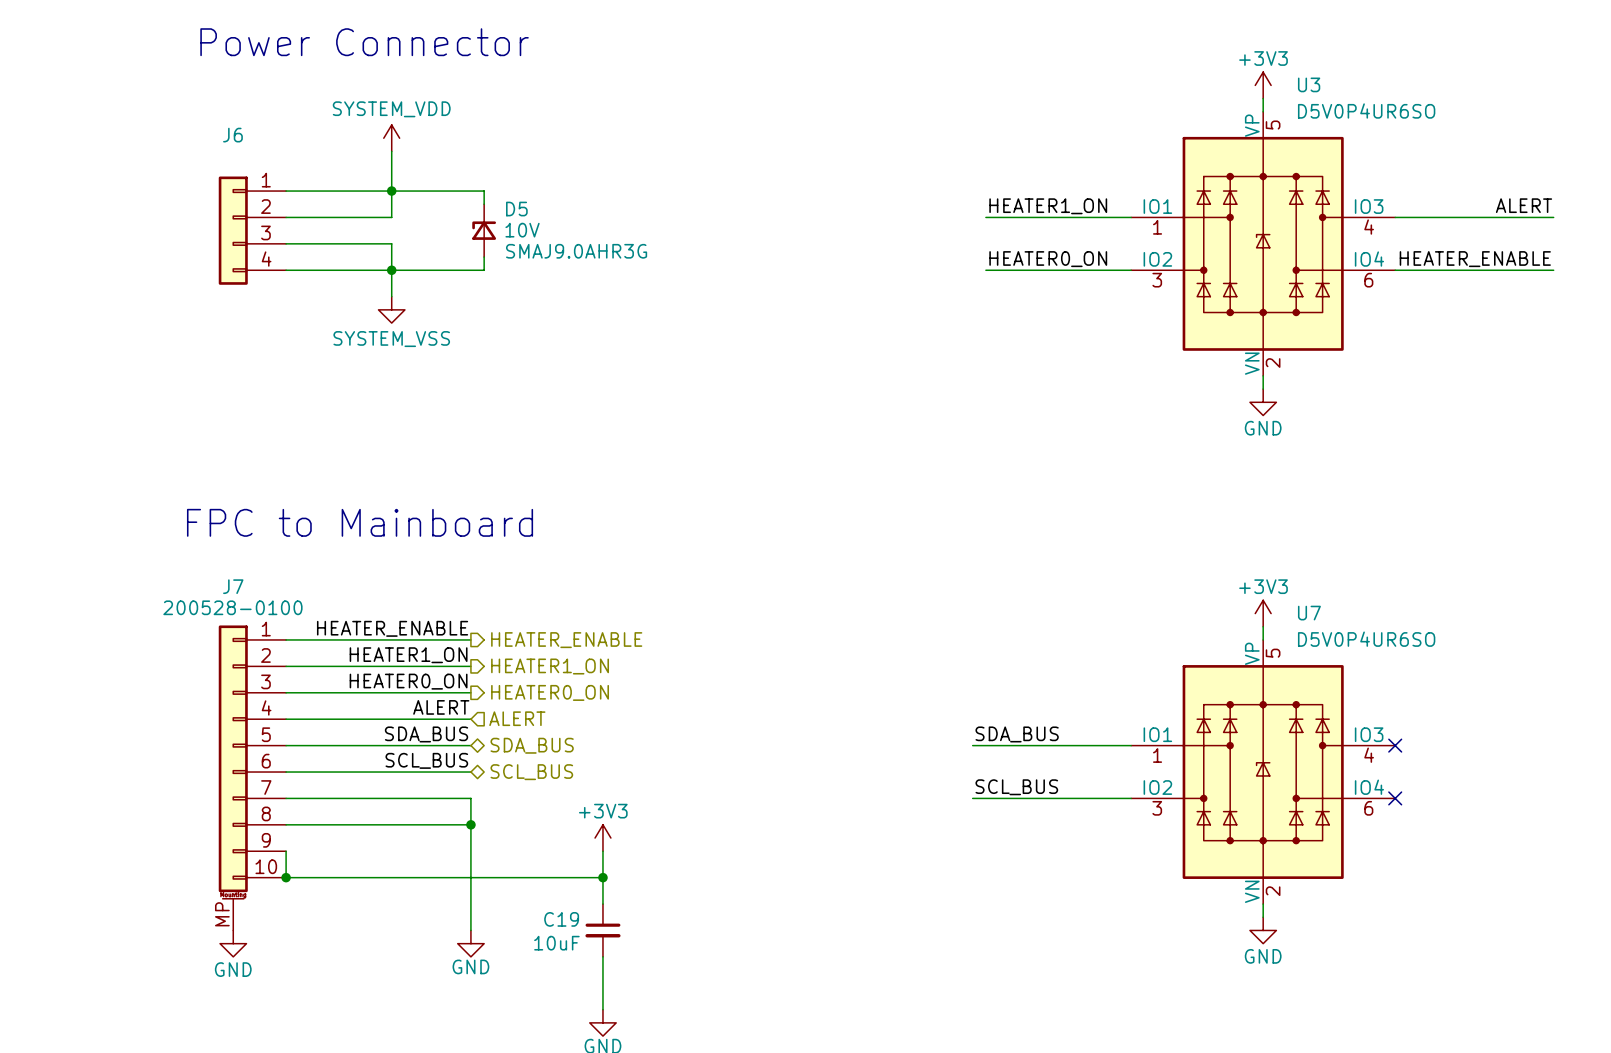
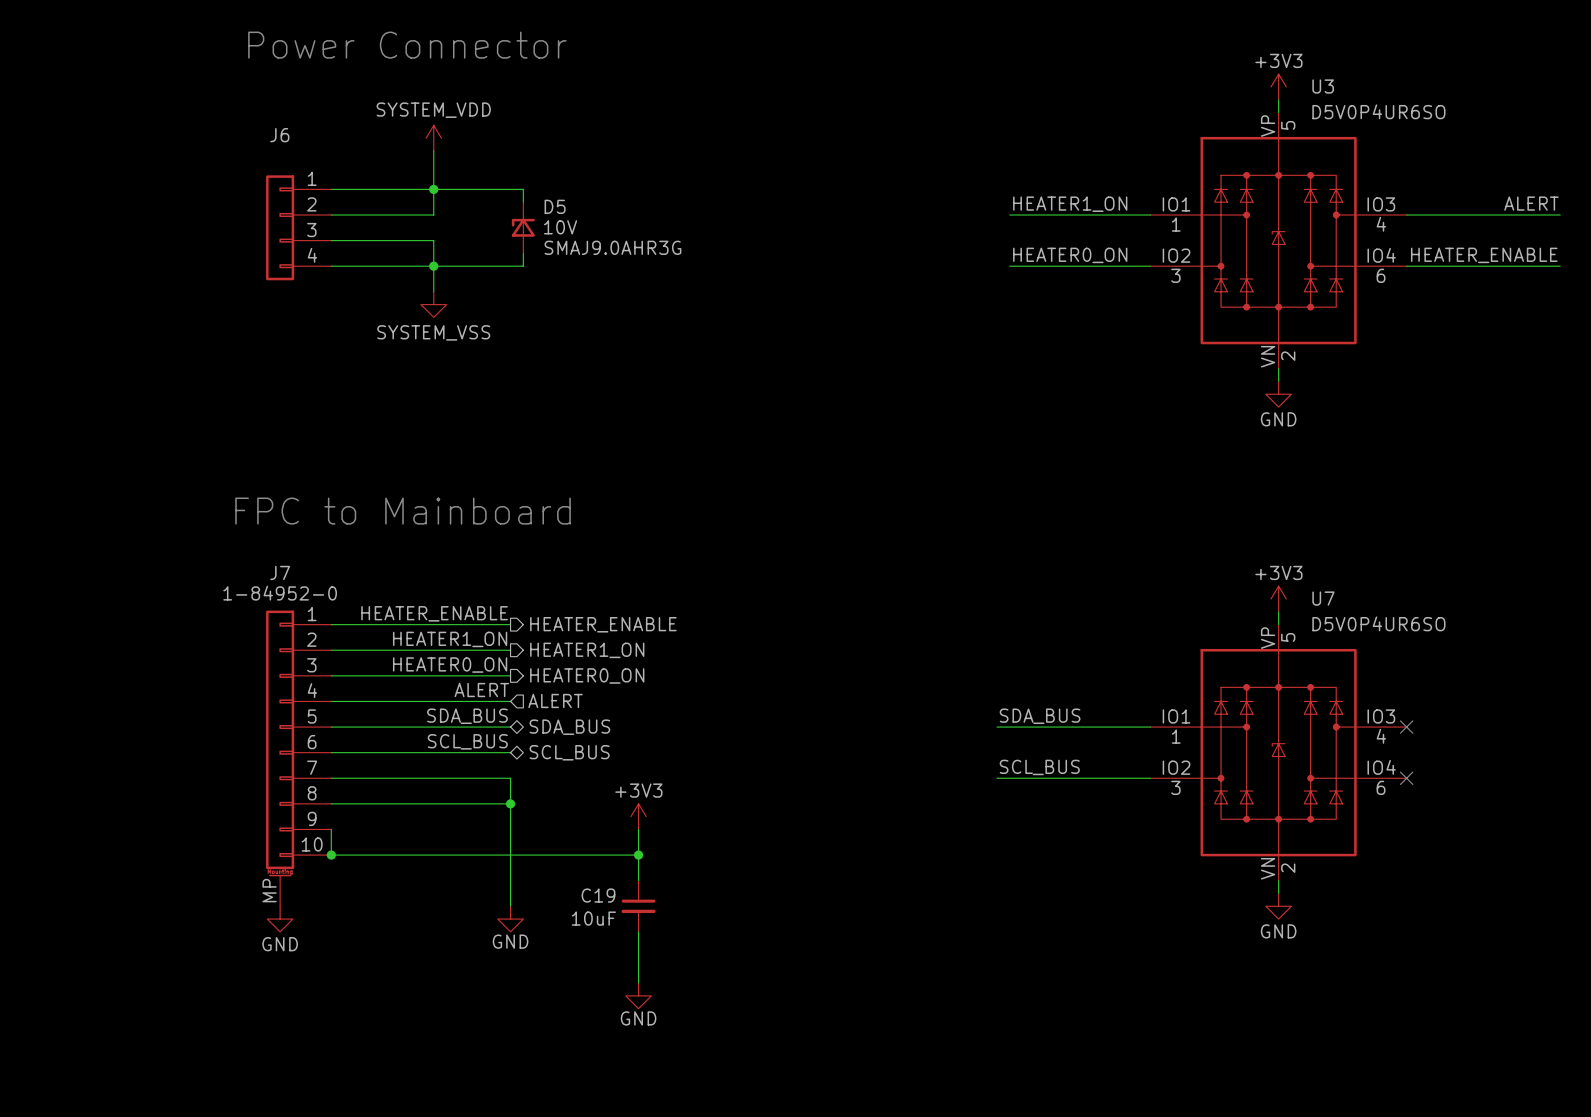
J7 value: 200528-0100 (232, 607) -> 1-84952-0 (280, 593)

